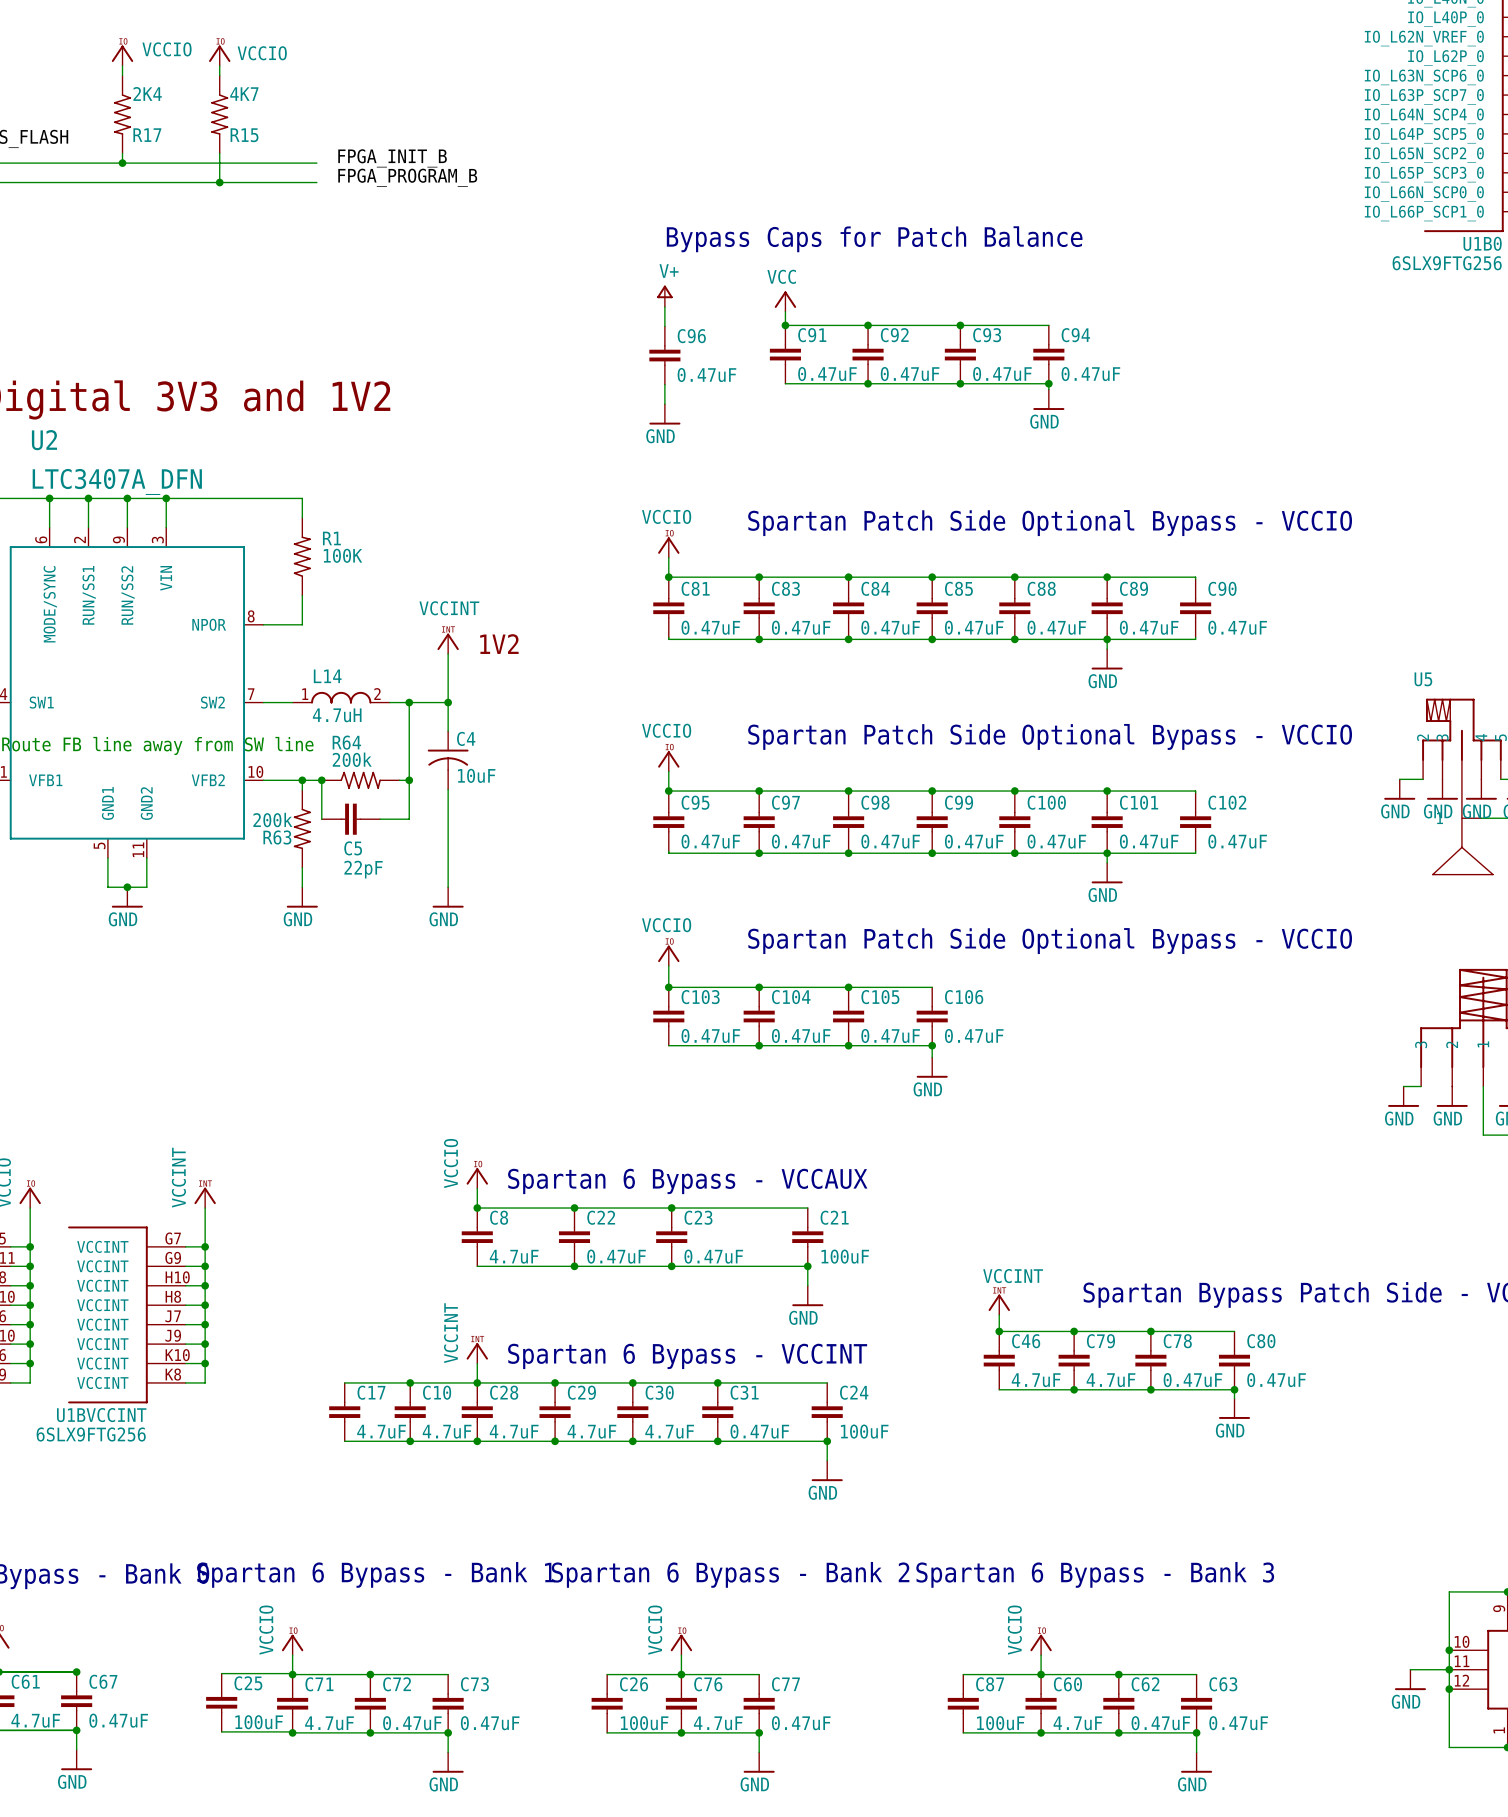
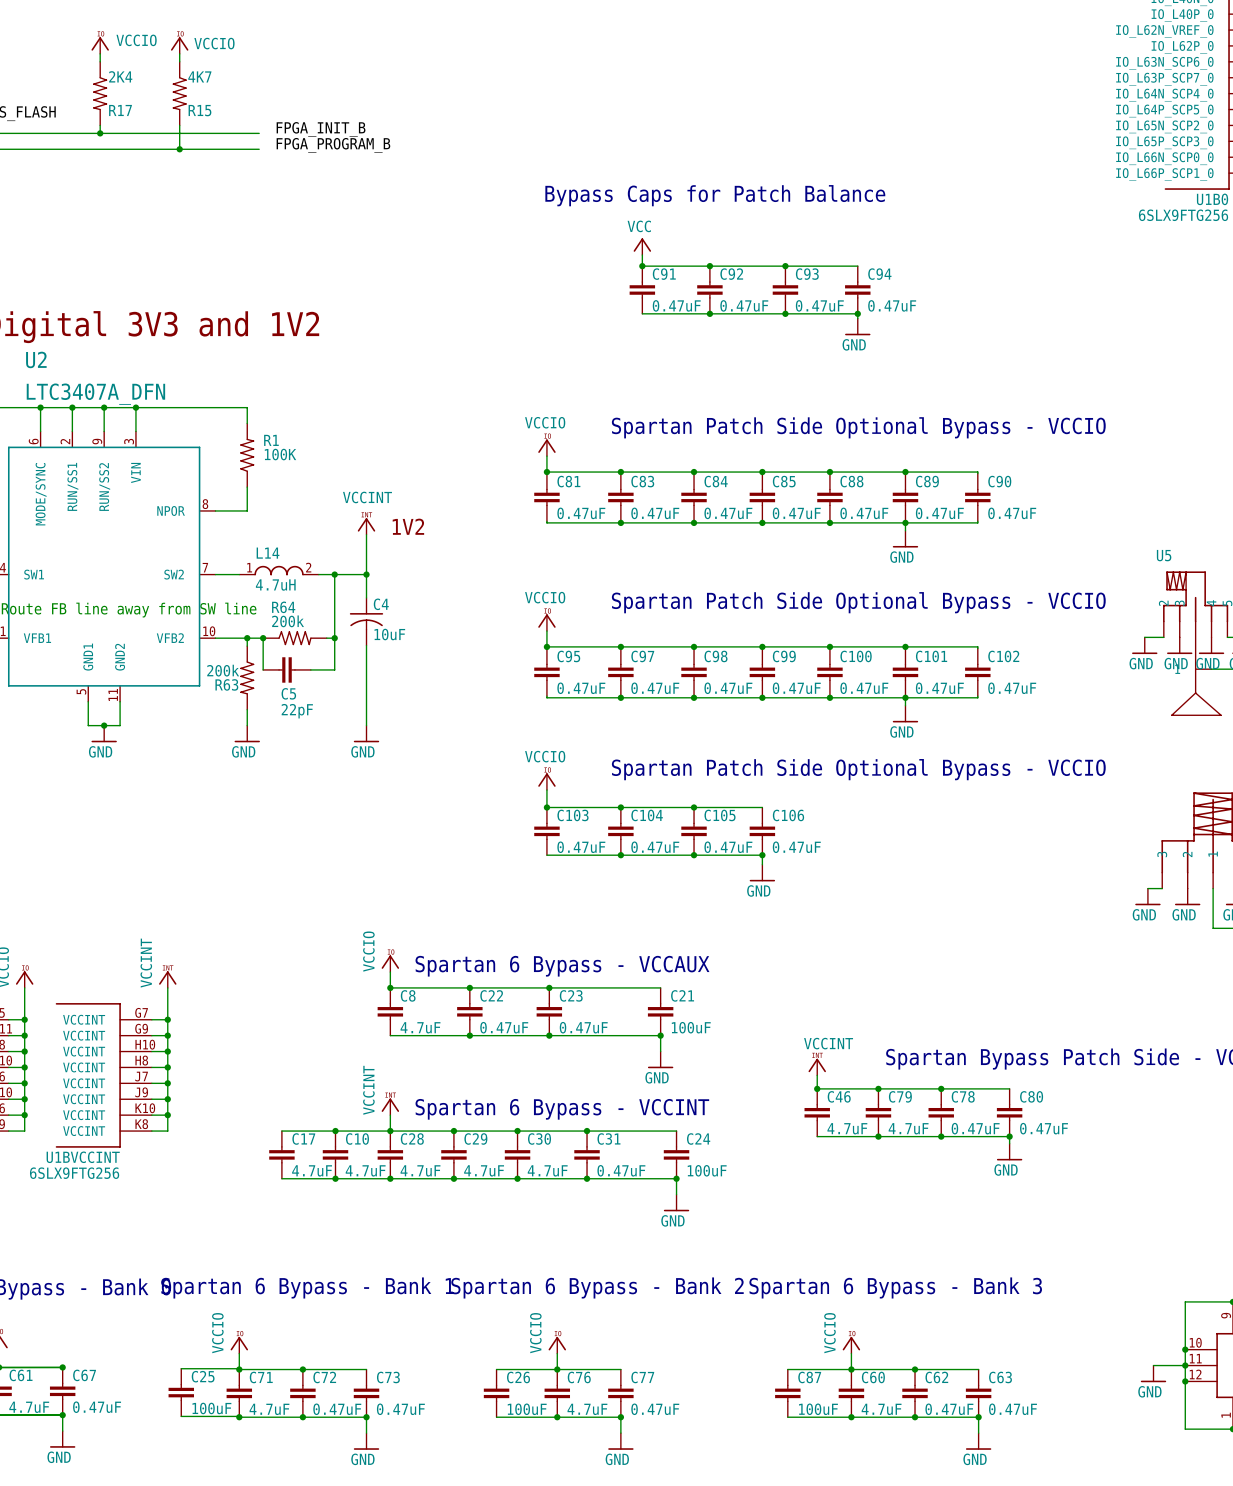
power symbol: V+ (664, 296) -> none
wire: (664, 306) (664, 326) -> none
C96: 0.47uF (664, 355) -> none
wire: (664, 384) (664, 404) -> none
power symbol: GND (664, 414) -> none

